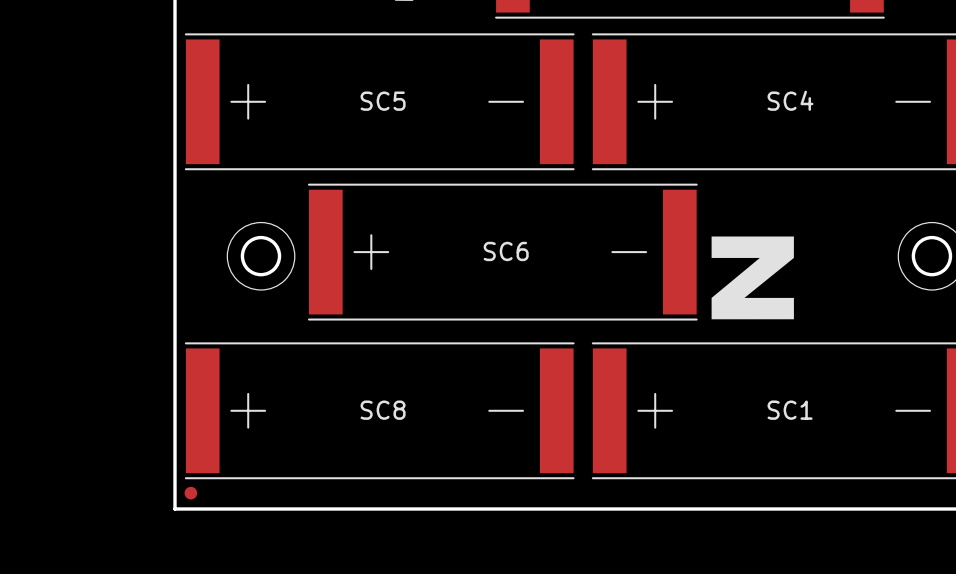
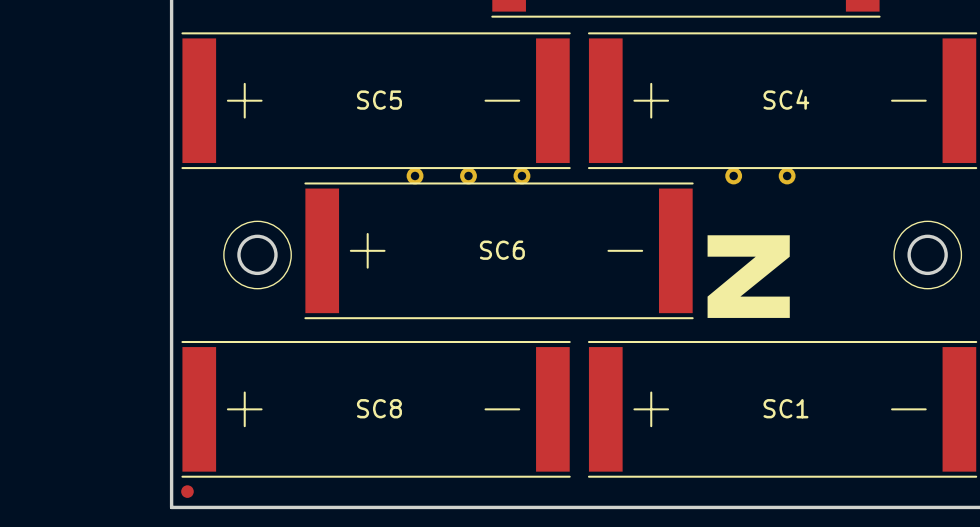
part: none -> (415, 175)
part: none -> (468, 175)
part: none -> (521, 175)
part: none -> (733, 175)
part: none -> (787, 175)

